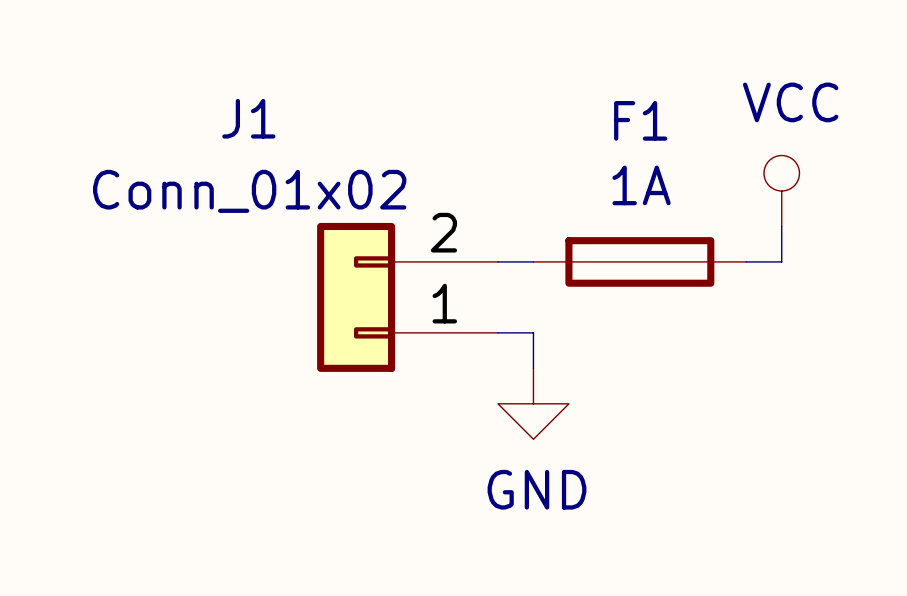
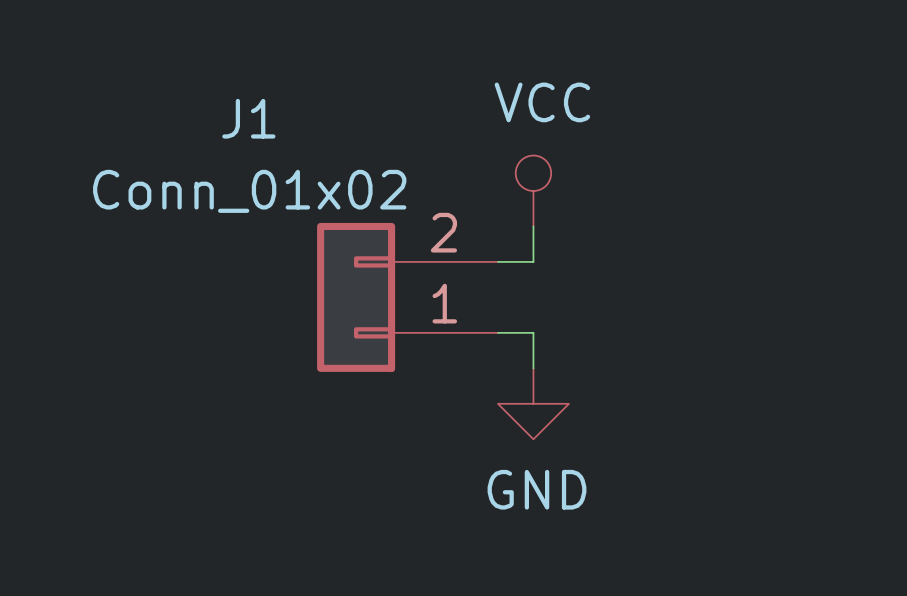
power symbol position: VCC (781, 191) -> VCC (533, 191)
wire: none -> (533, 226) (533, 261)
wire: (781, 226) (781, 261) (746, 261) -> none
F1: 1A (639, 261) -> none

